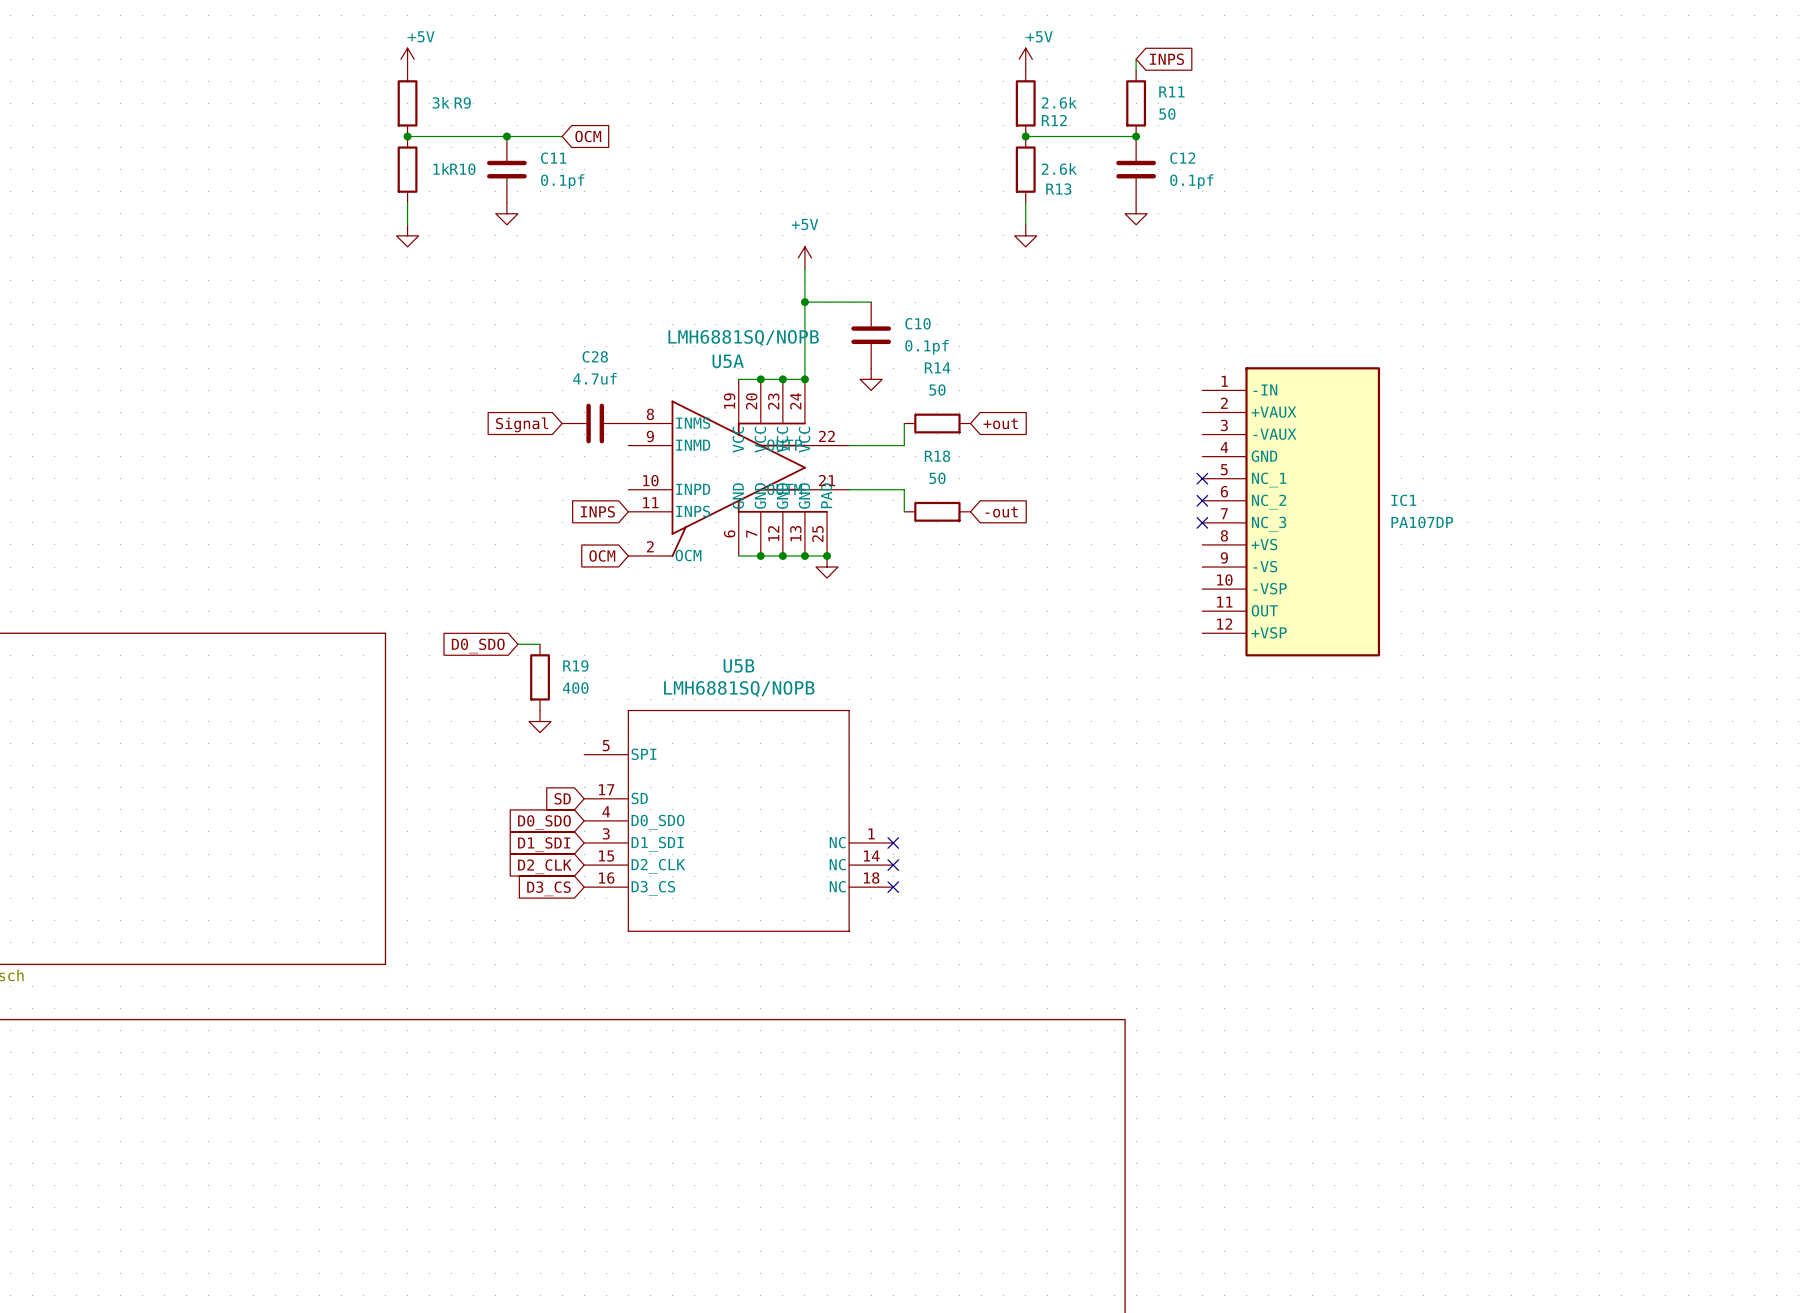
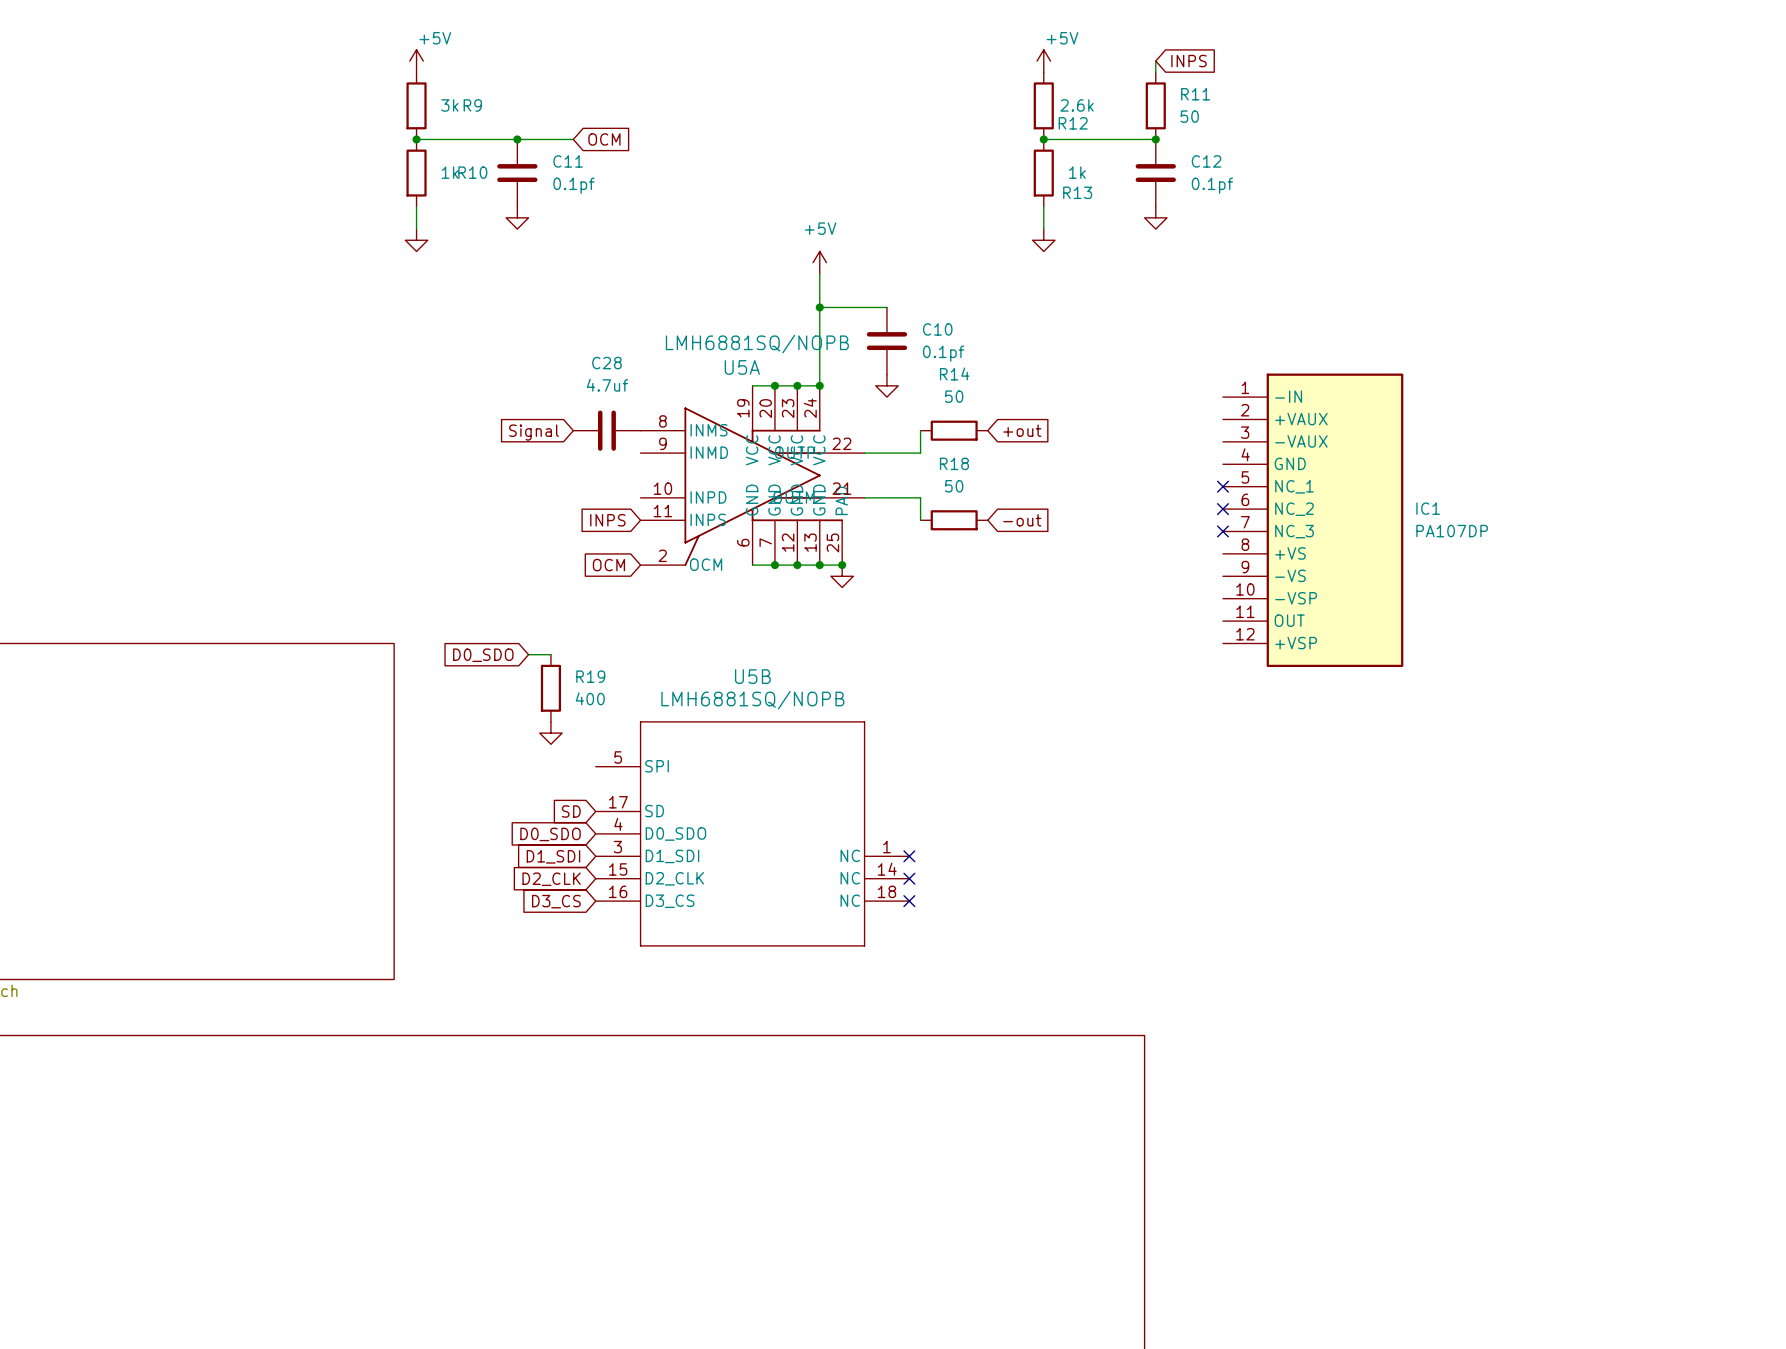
R13 value: 2.6k (1059, 169) -> 1k (1077, 172)

